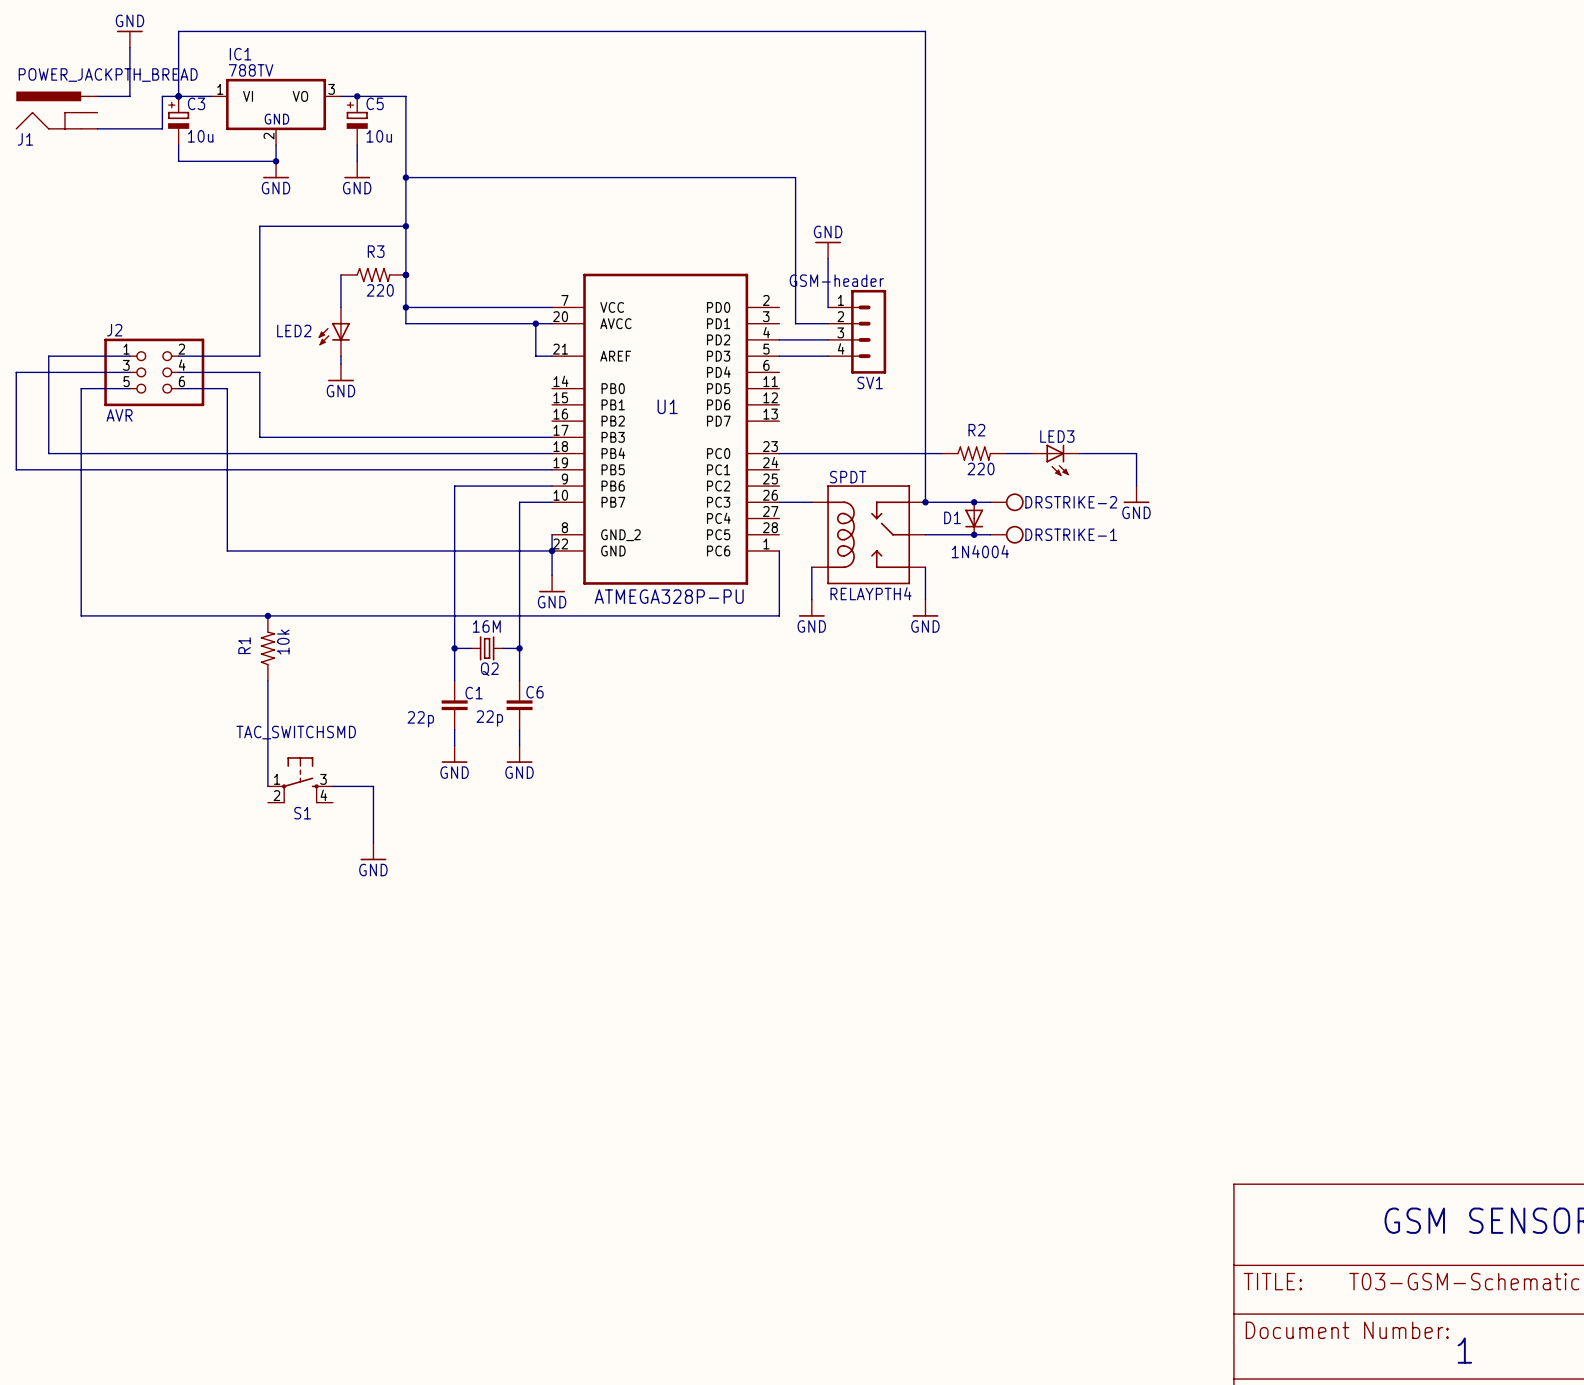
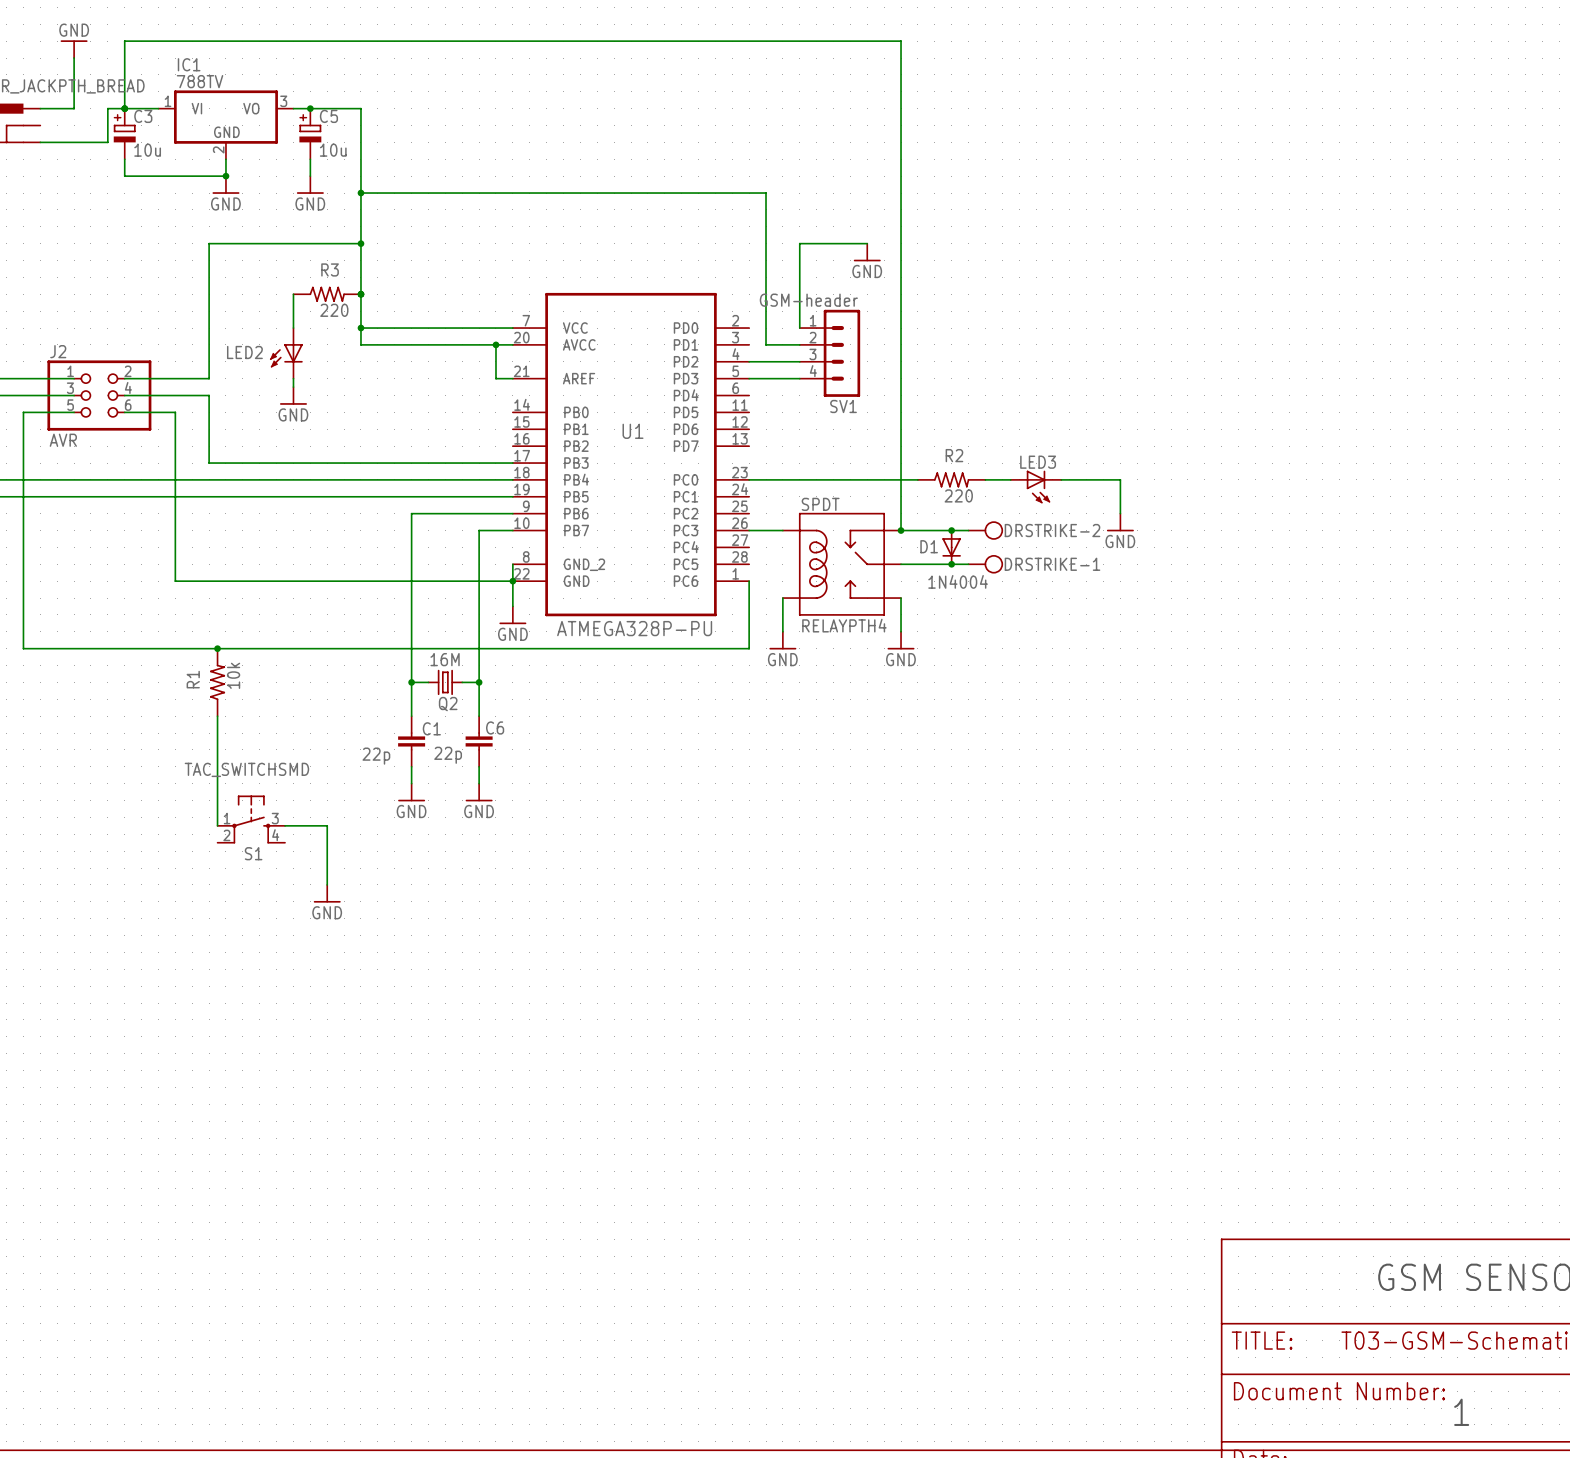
wire: none -> (867, 243) (799, 243) (799, 277)
power symbol rotation: 0° (828, 242) -> 180° (867, 260)
power symbol position: GND (828, 250) -> GND (867, 252)

